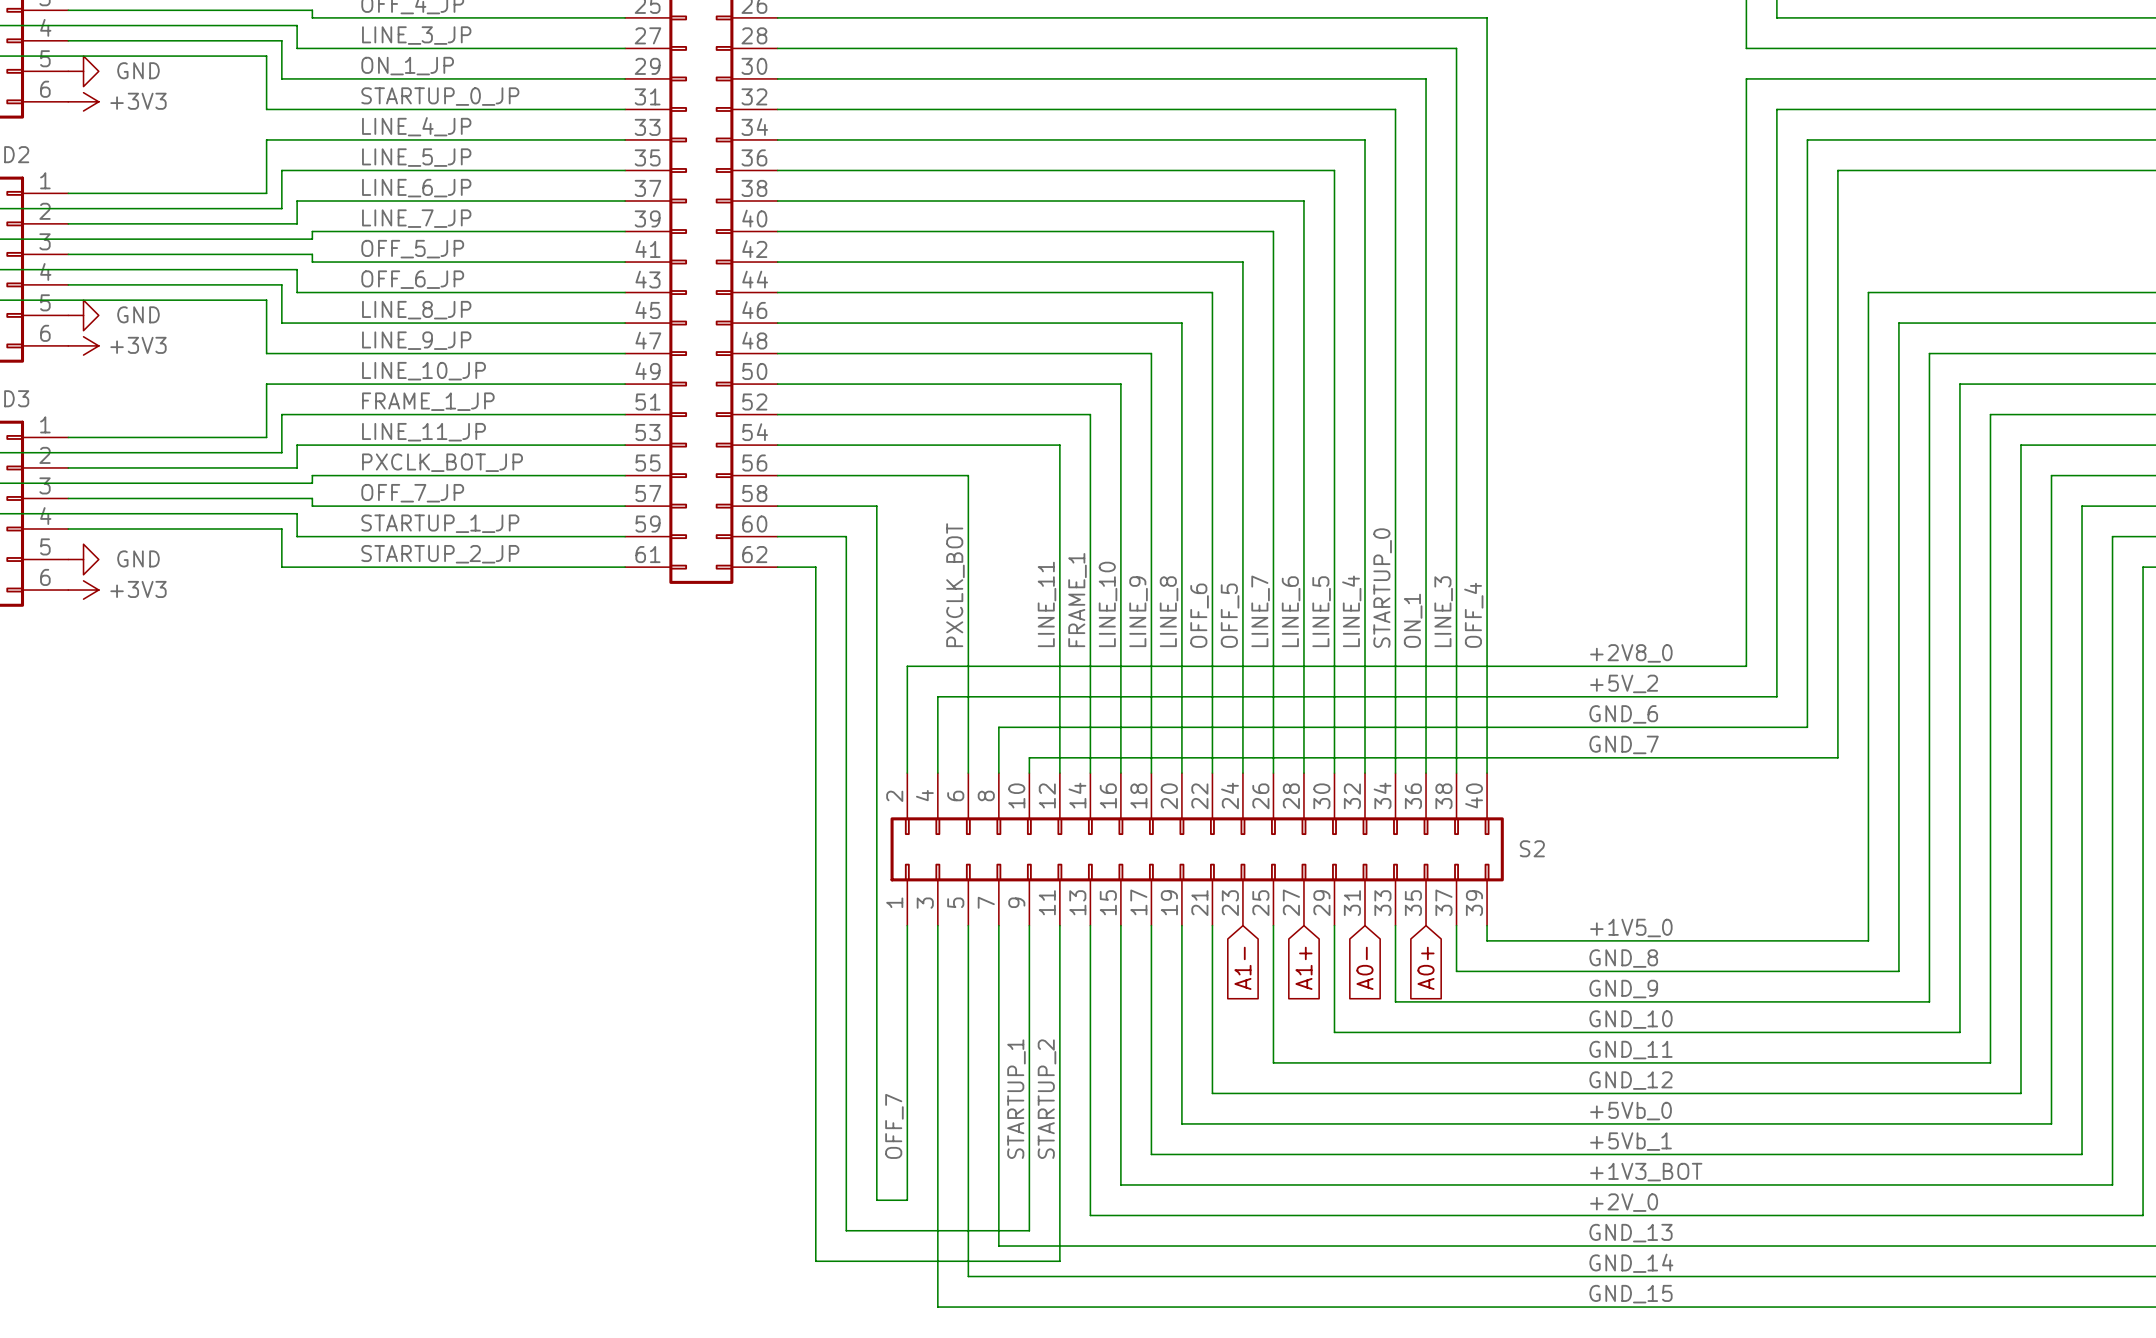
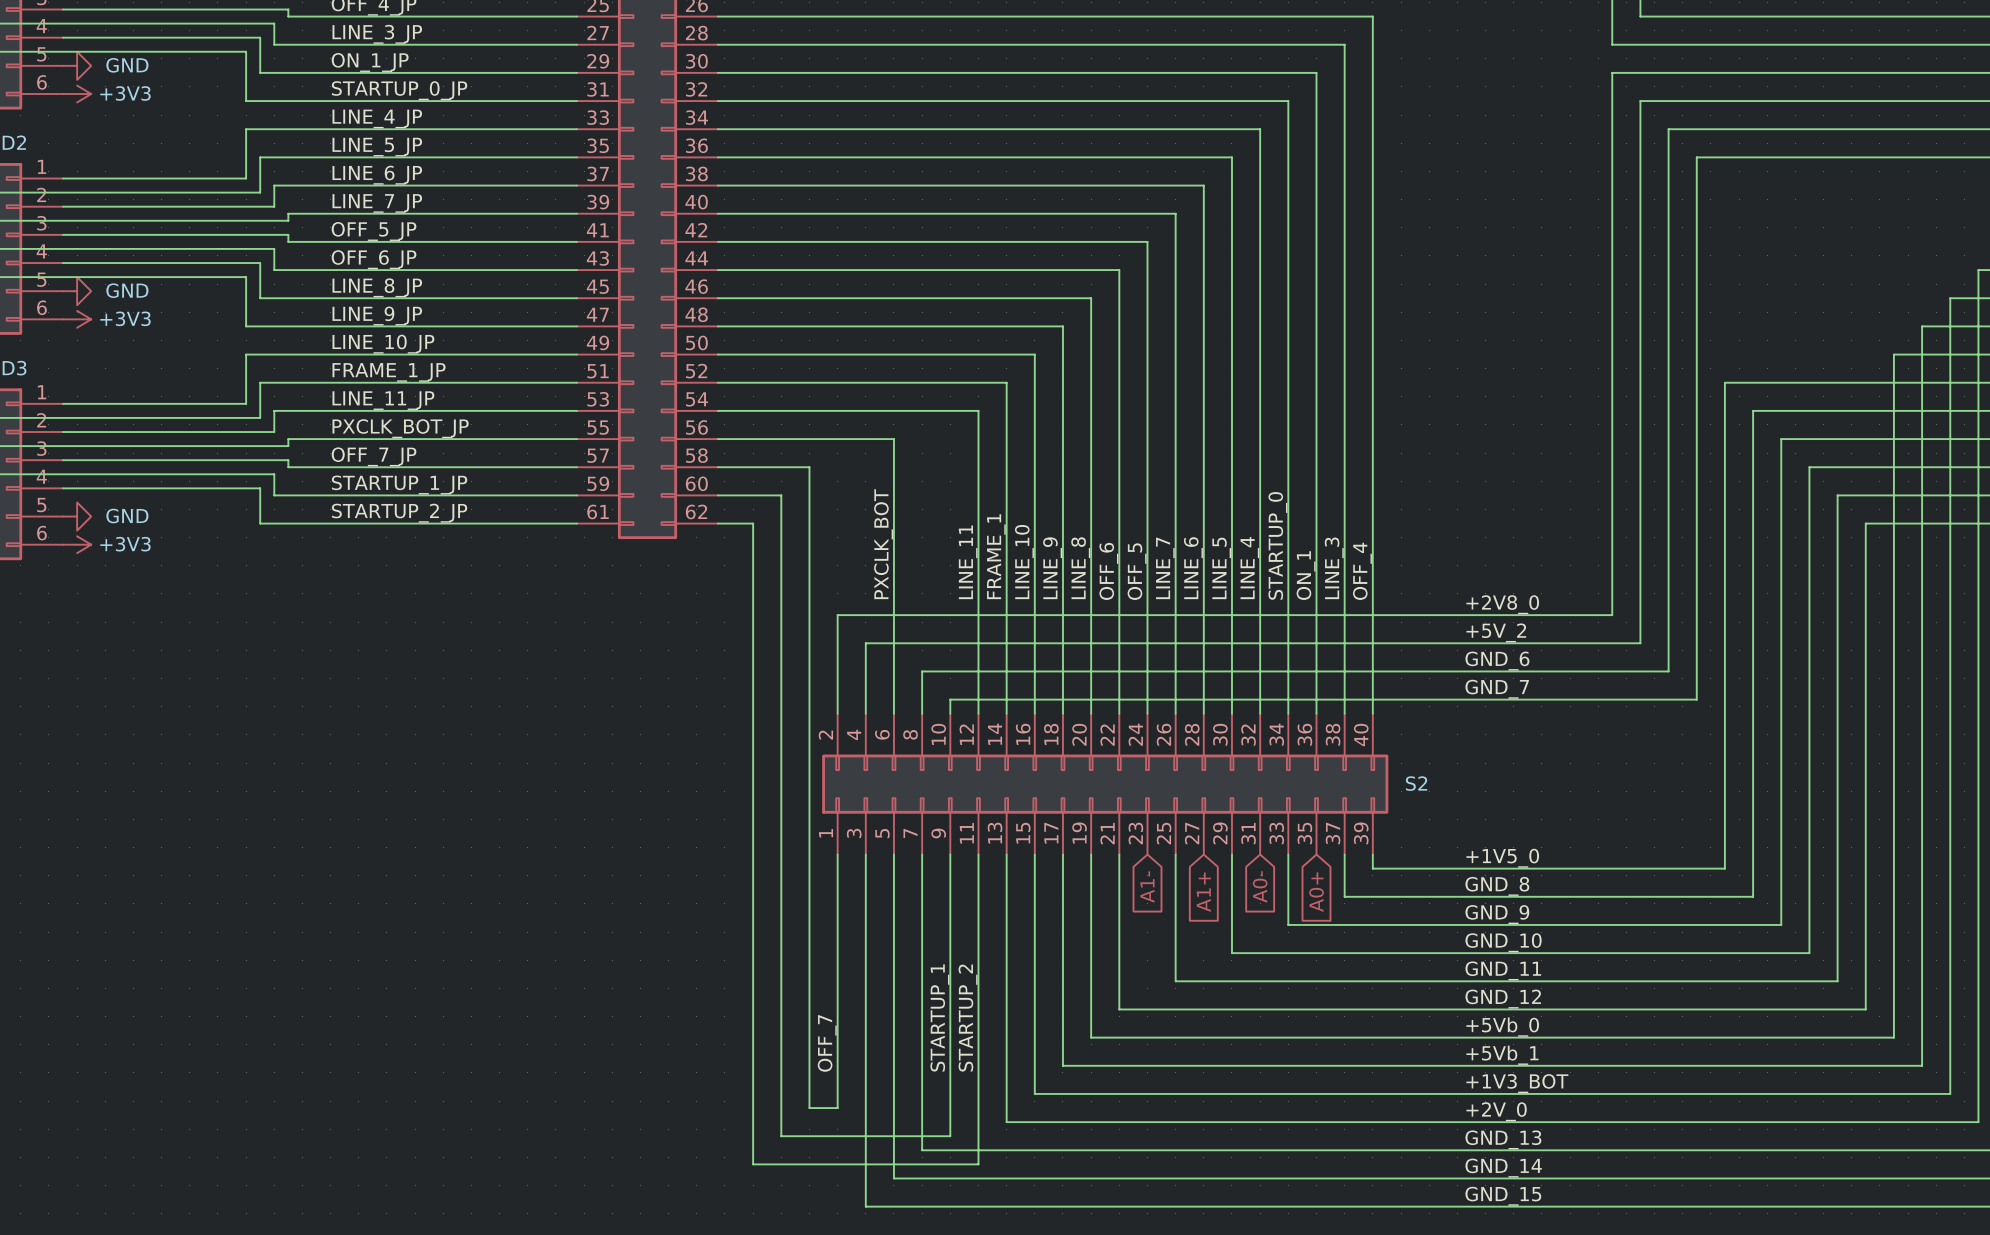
wire: (2143, 292) (1868, 292) (1868, 414) -> (1978, 270) (1978, 523) (1865, 523)
wire: (2112, 323) (1898, 323) (1898, 445) -> (1950, 298) (1950, 495) (1837, 495)
wire: (2082, 353) (1929, 353) (1929, 475) -> (1922, 326) (1922, 467) (1809, 467)
wire: (2051, 384) (1959, 384) (1959, 506) -> (1893, 354) (1893, 439) (1781, 439)
wire: (1990, 414) (1990, 536) -> (1837, 382) (1724, 382)
wire: (2020, 445) (2020, 567) -> (1865, 410) (1753, 410)

